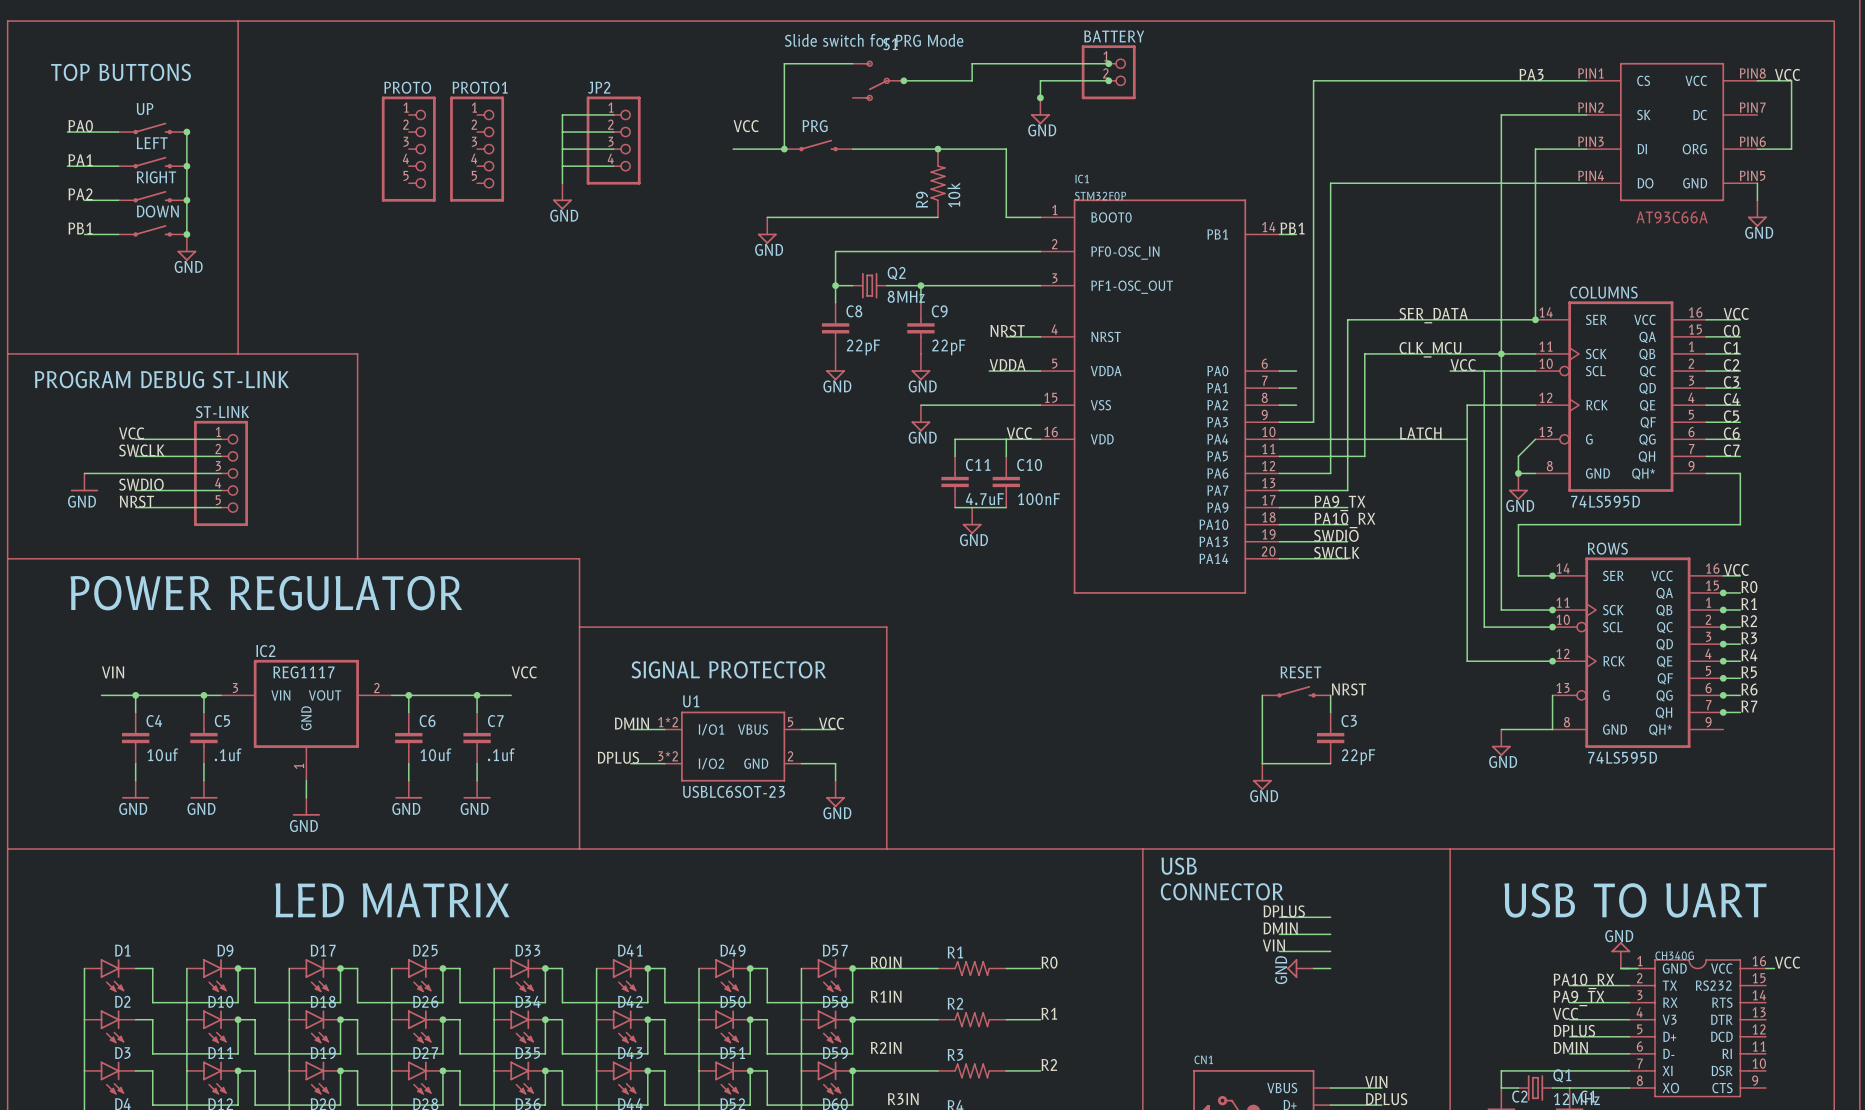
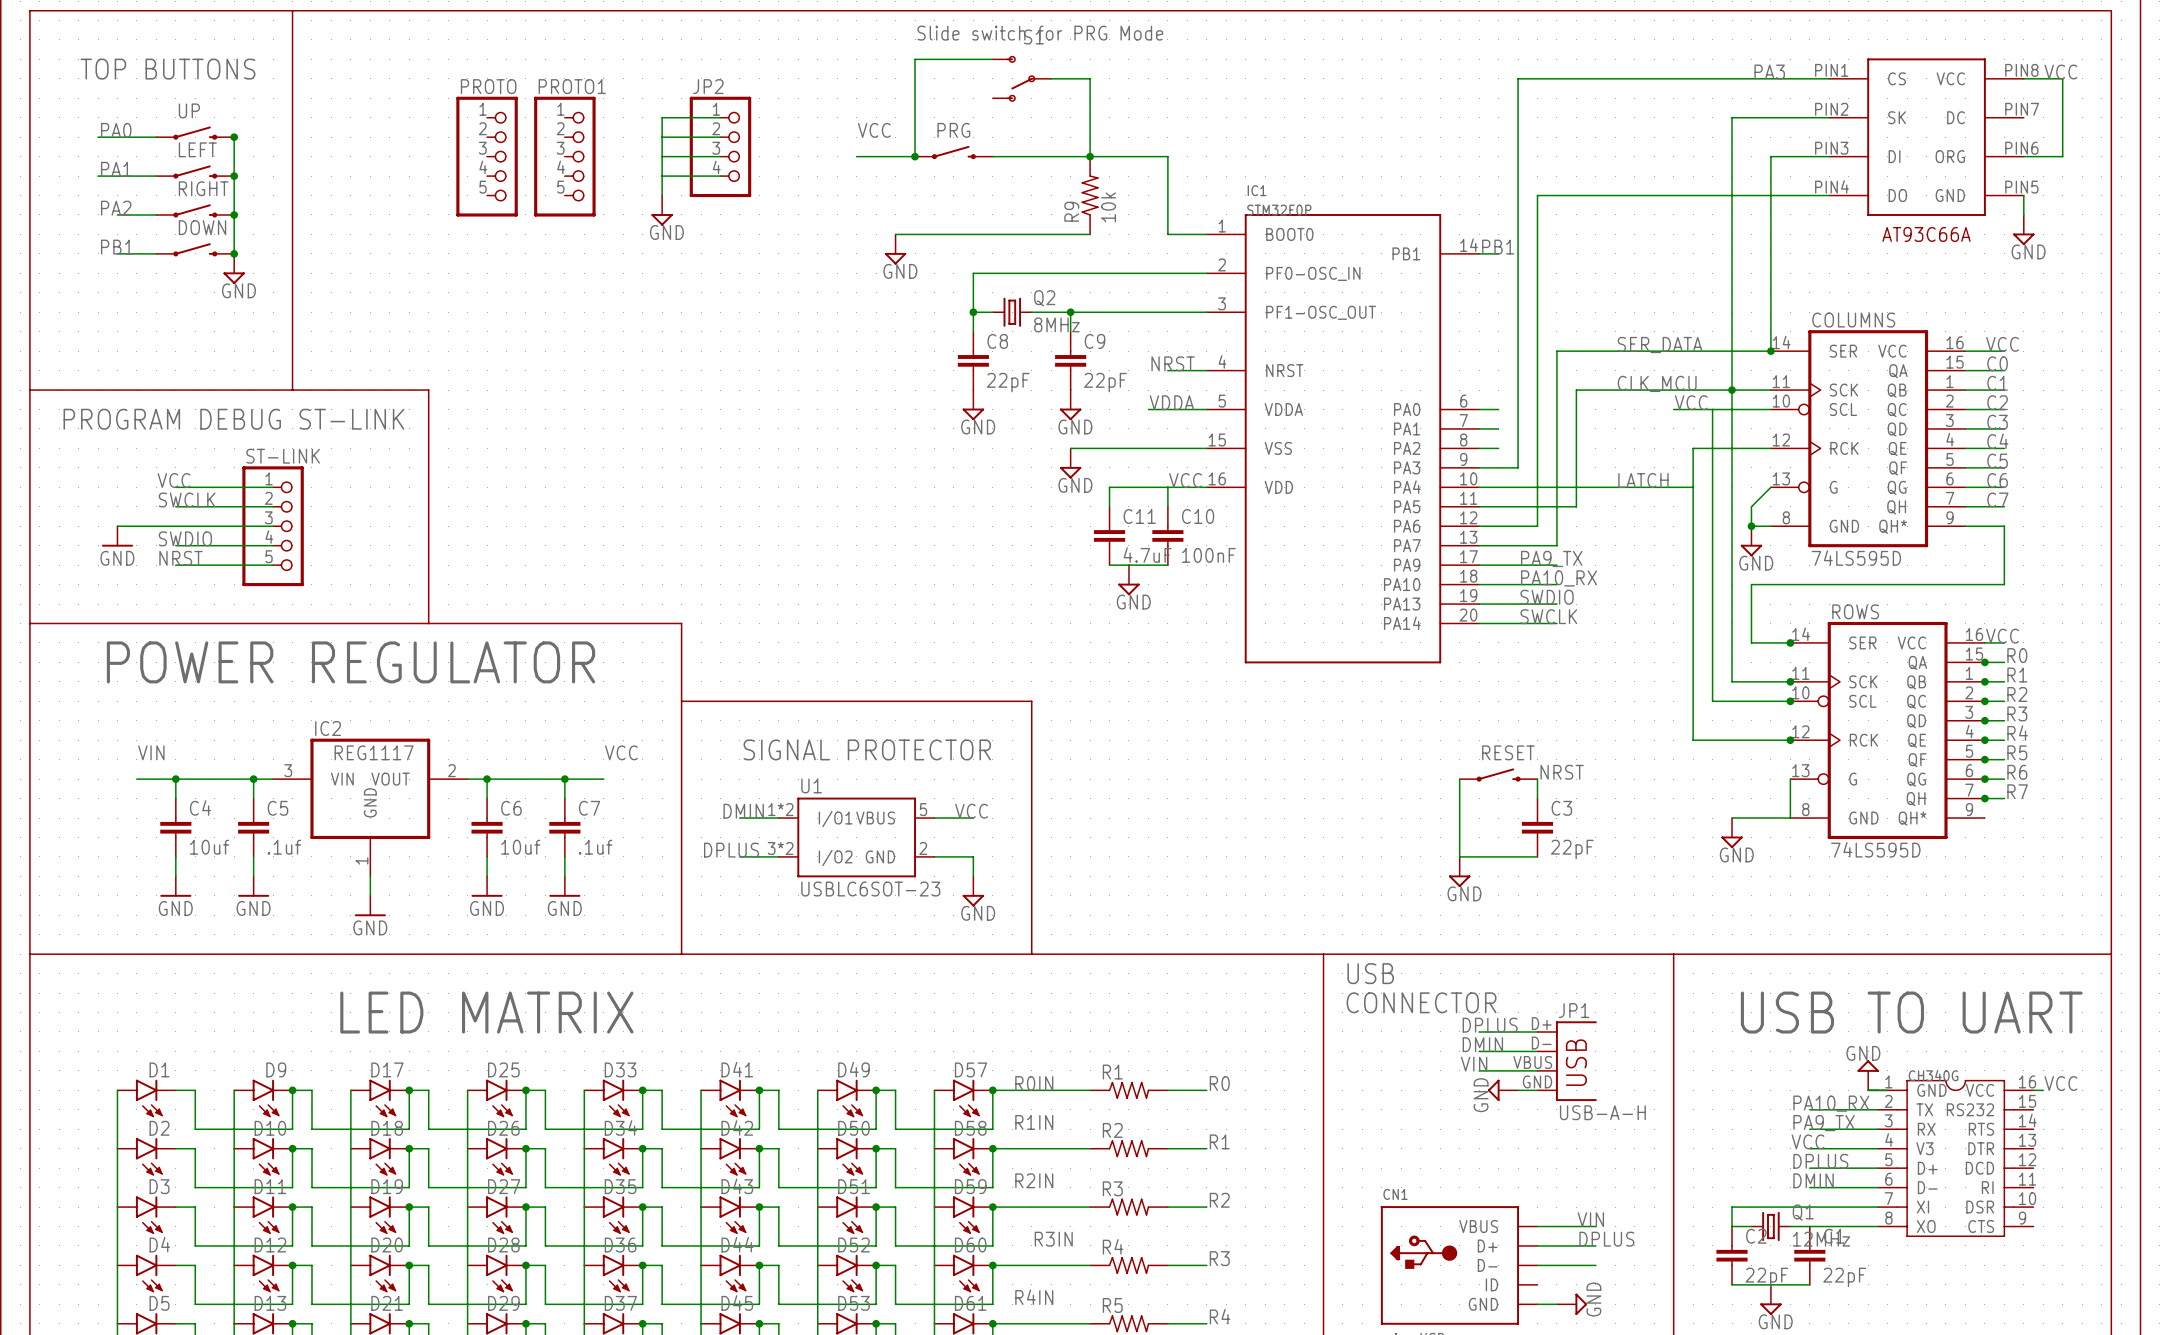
wire: (1108, 63) (972, 63) (972, 80) (938, 80) -> (1090, 156) (1090, 78)
junction: (1108, 63) -> none
BATTERY: (1108, 72) -> none
junction: (903, 80) -> none
wire: (1108, 80) (1040, 80) (1040, 97) -> none
junction: (1108, 80) -> none
junction: (1040, 97) -> none
power symbol: GND (1040, 111) -> none
JP1: none -> USB-A-H (1567, 1061)

